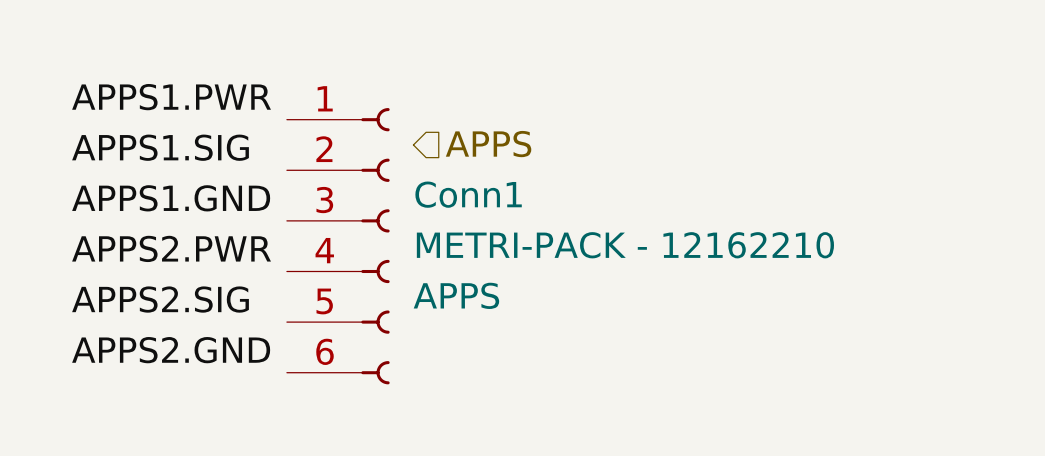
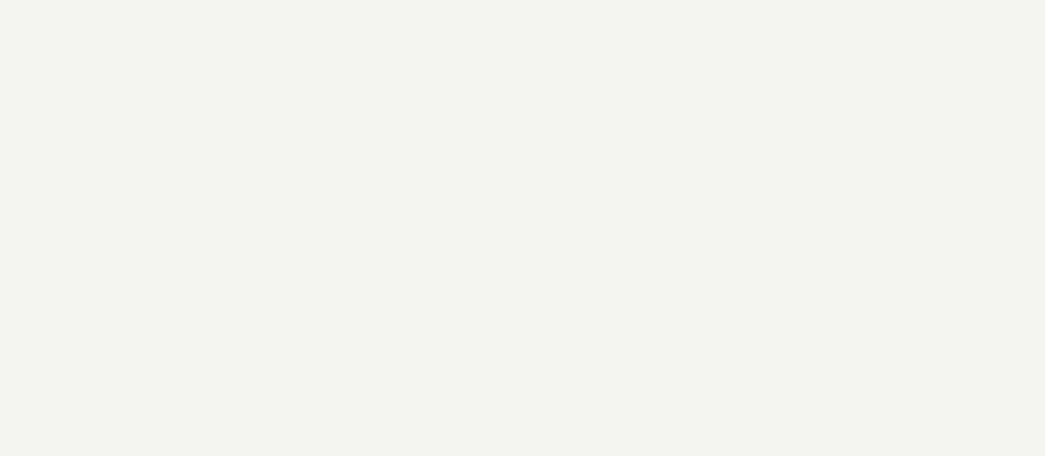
label: APPS1.PWR (171, 97) -> none
hierarchical label: APPS (488, 144) -> none
label: APPS1.SIG (160, 147) -> none
label: APPS1.GND (171, 198) -> none
Conn1: METRI-PACK - 12162210 (338, 246) -> none
label: APPS2.PWR (171, 248) -> none
label: APPS2.SIG (160, 299) -> none
label: APPS2.GND (171, 350) -> none

